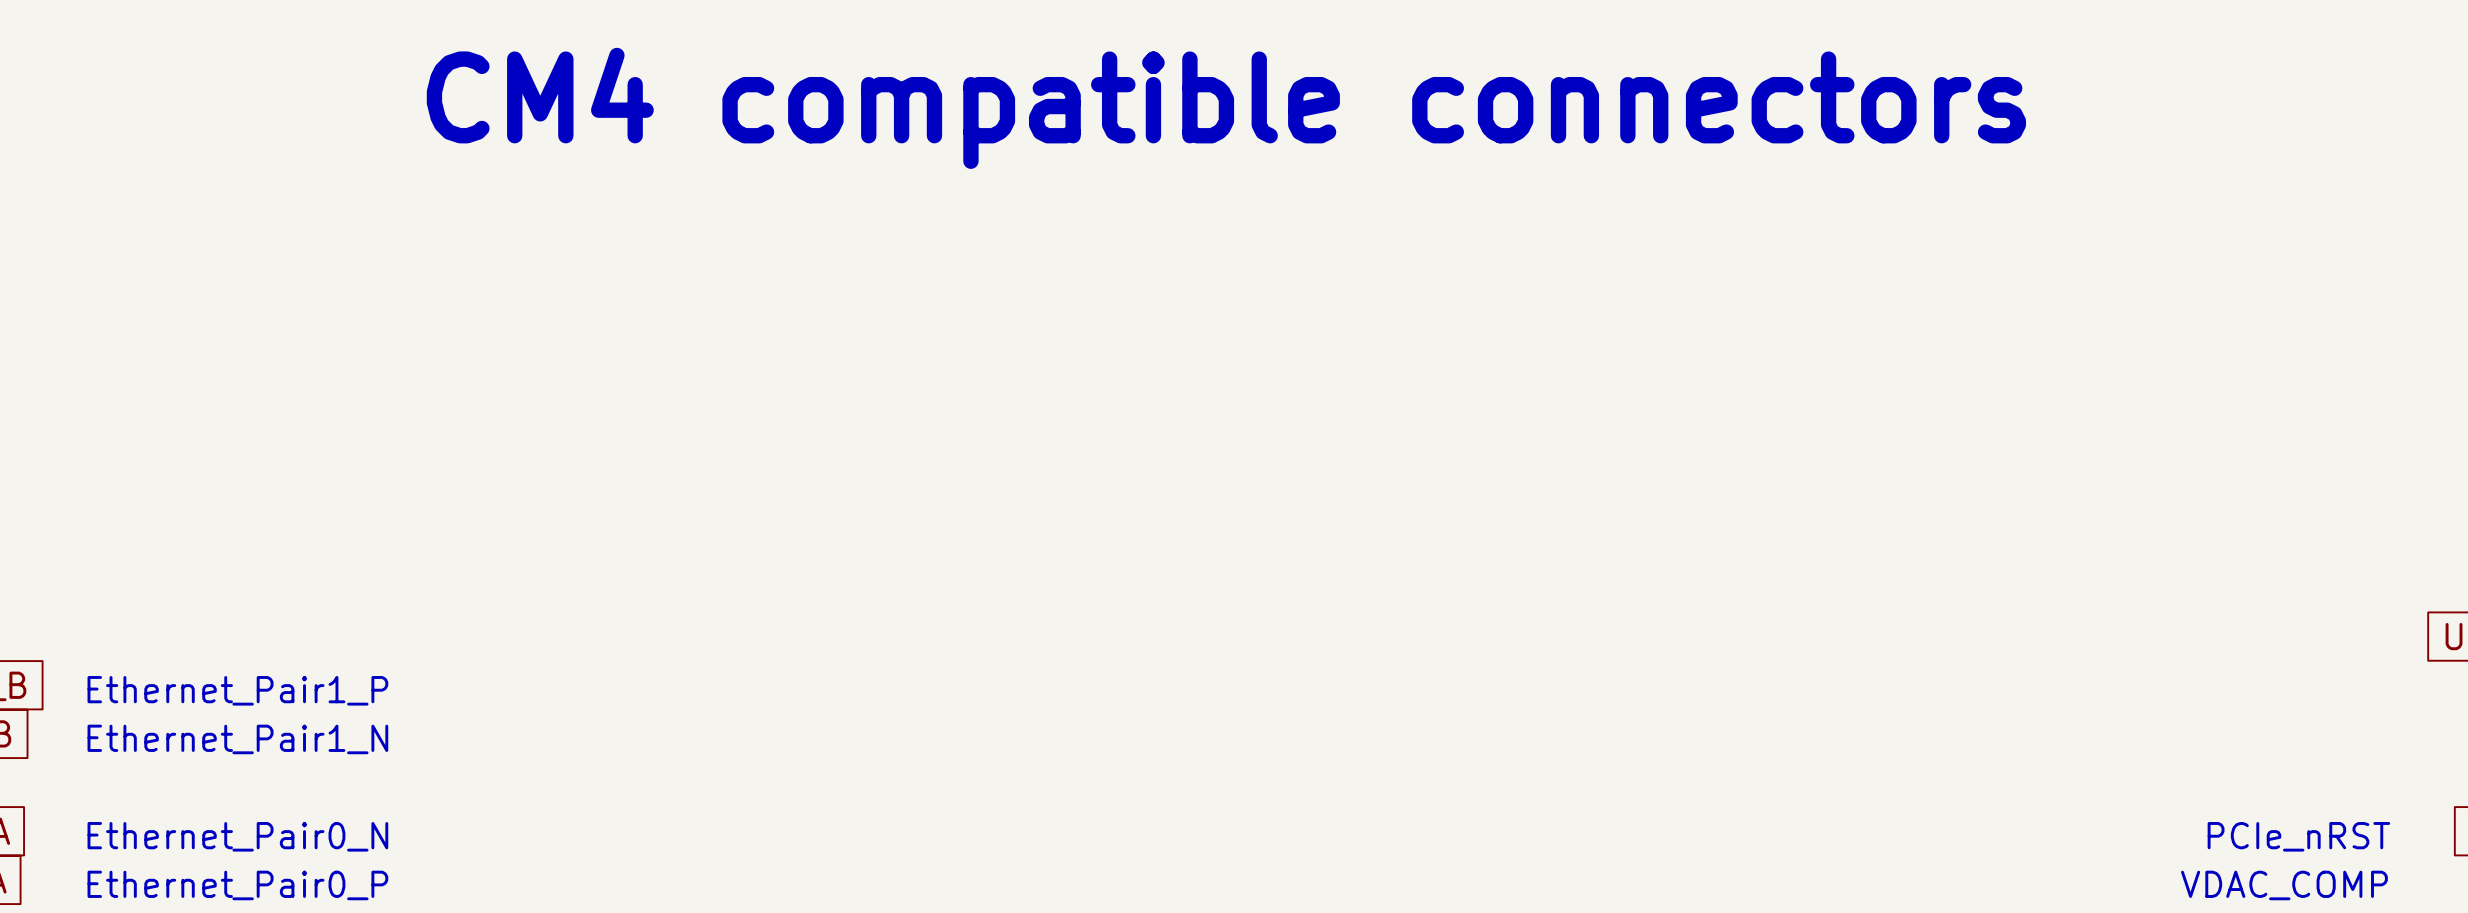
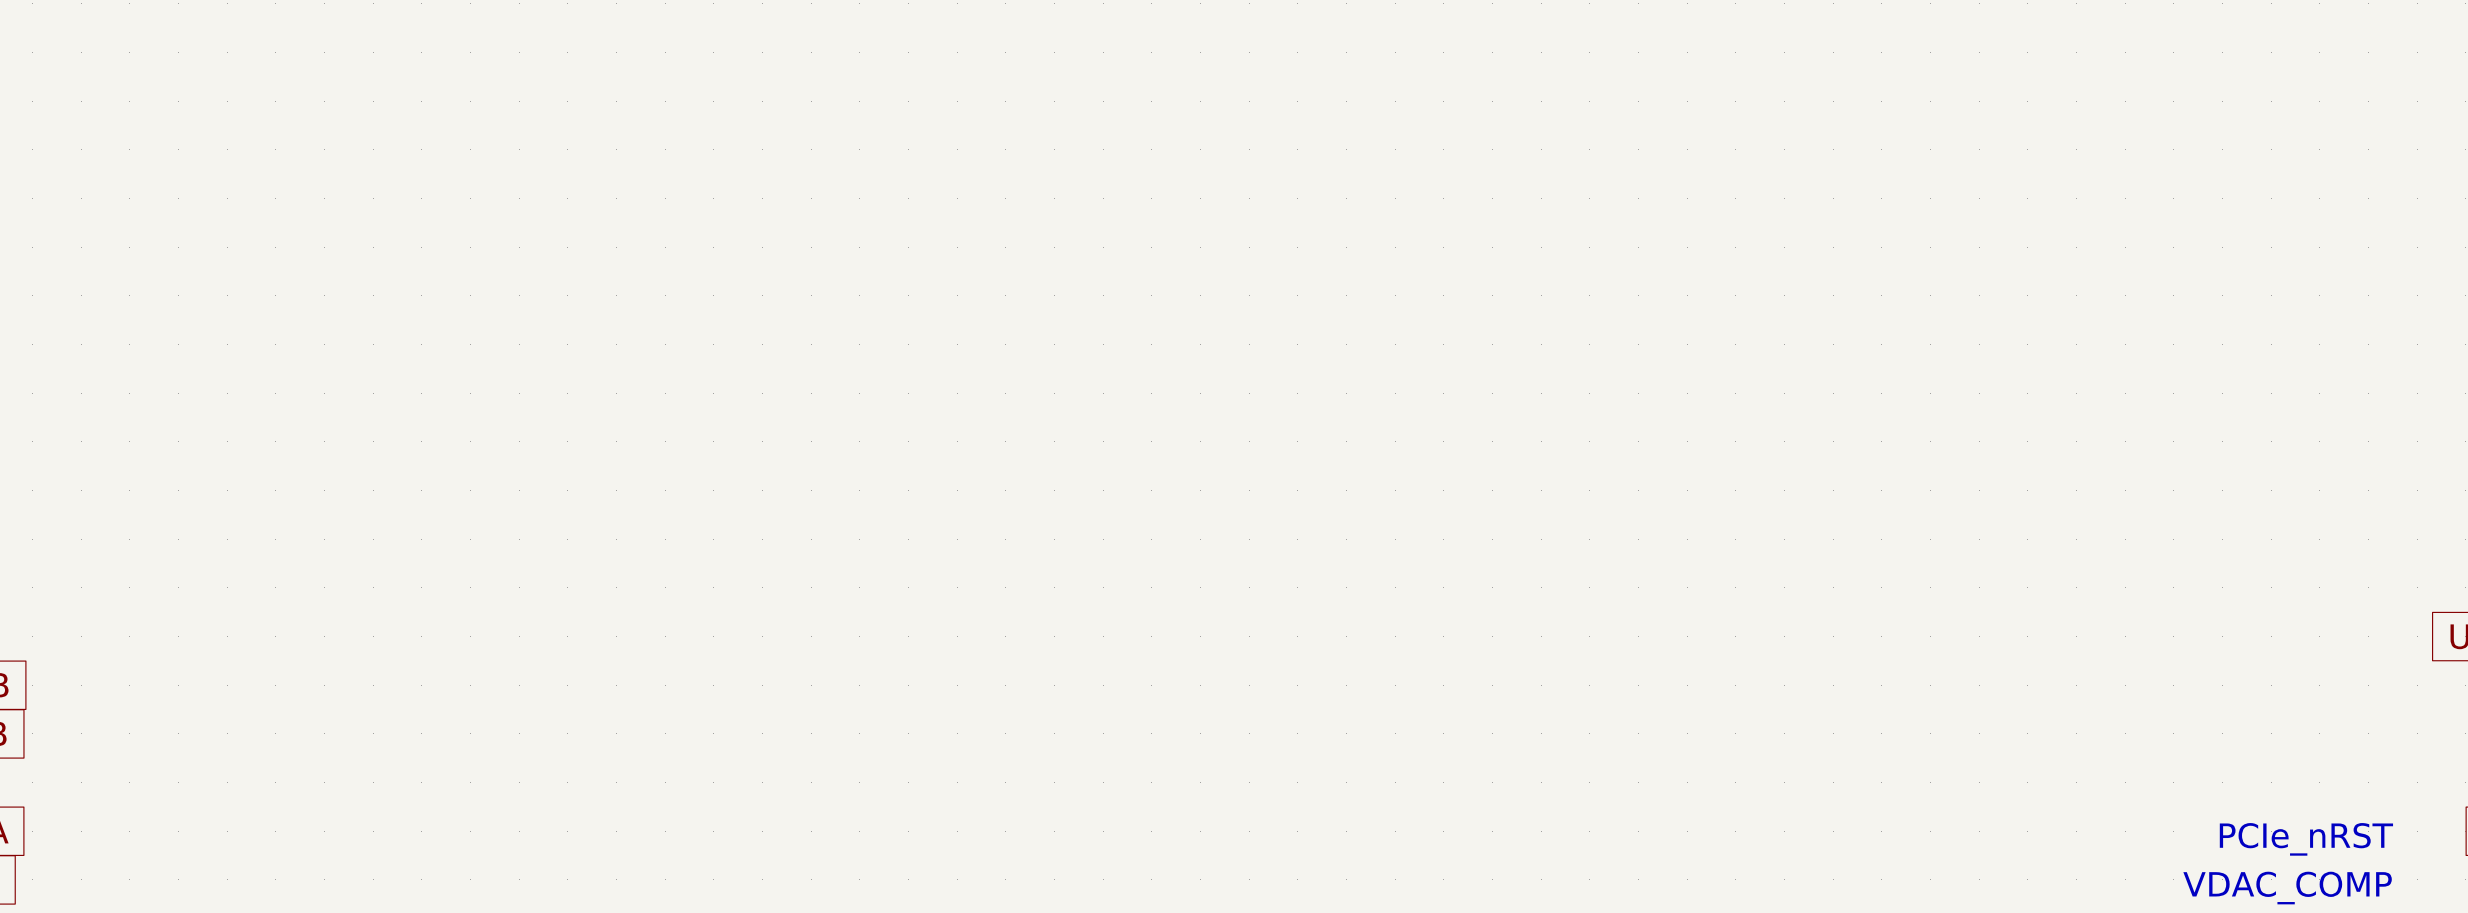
text: CM4 compatible connectors (1226, 108) -> none
text: Ethernet_Pair1_P (237, 690) -> none
text: Ethernet_Pair1_N (237, 739) -> none
text: Ethernet_Pair0_N (237, 836) -> none
text: Ethernet_Pair0_P (237, 885) -> none

